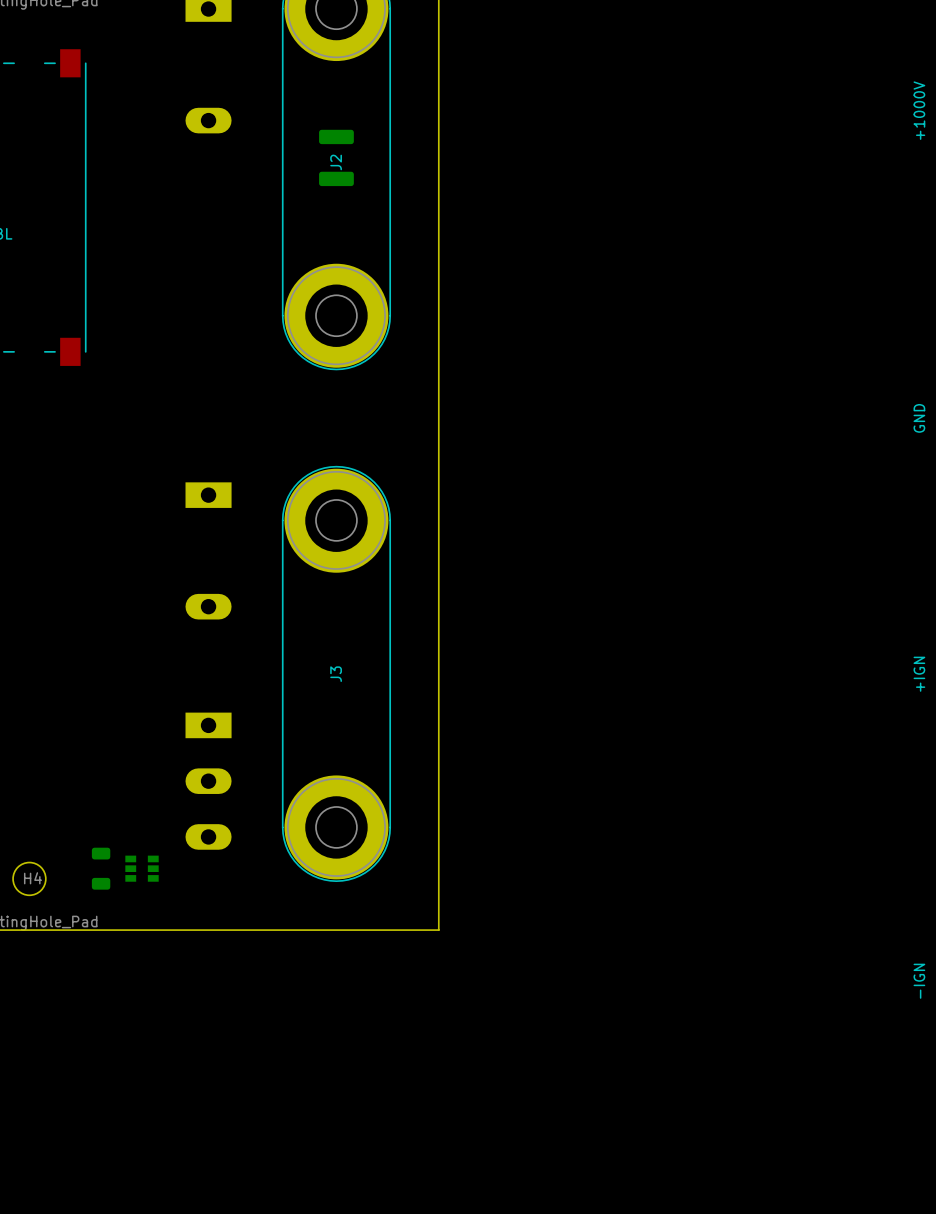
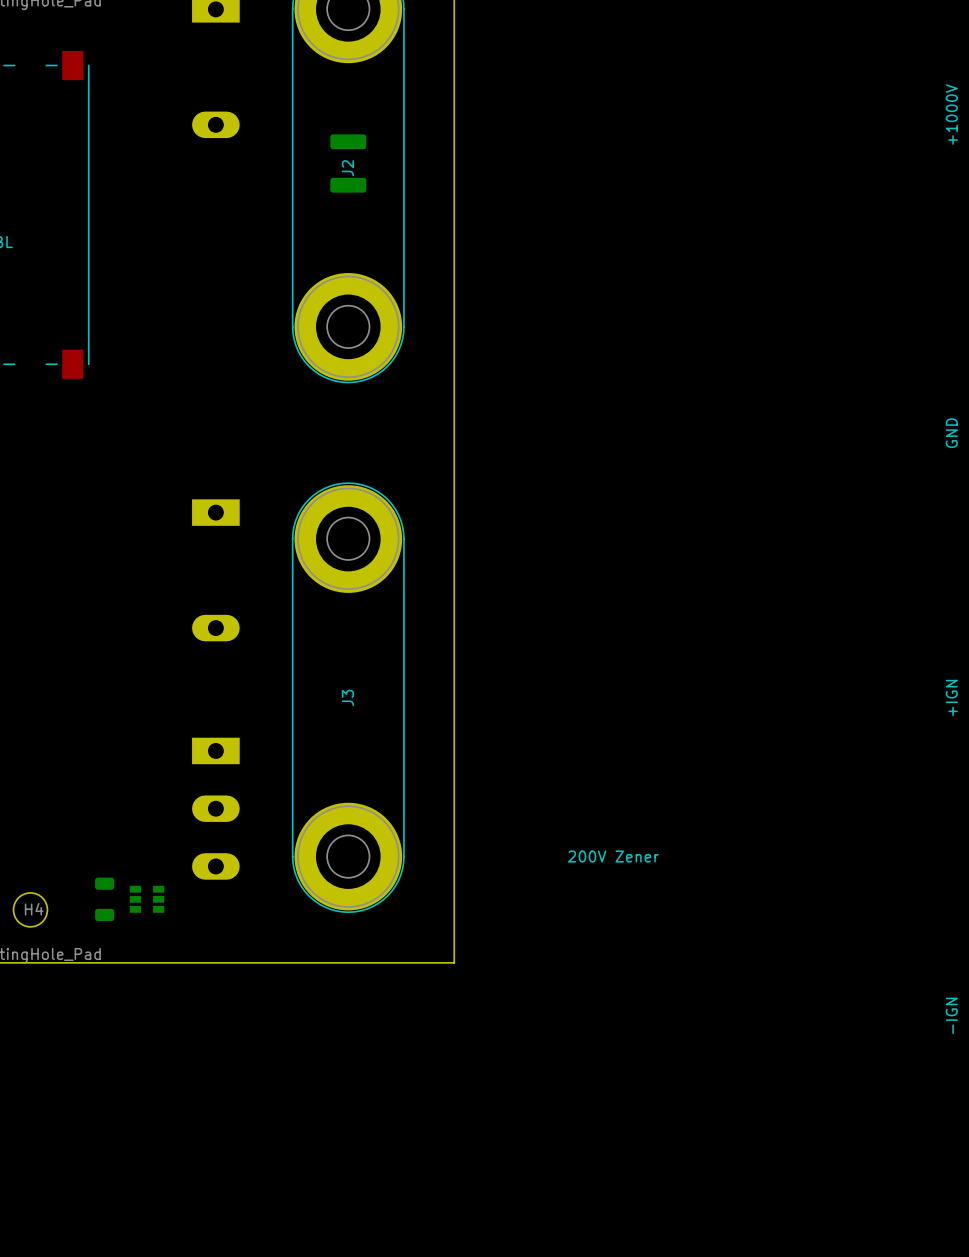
text: none -> 200V Zener (613, 856)

